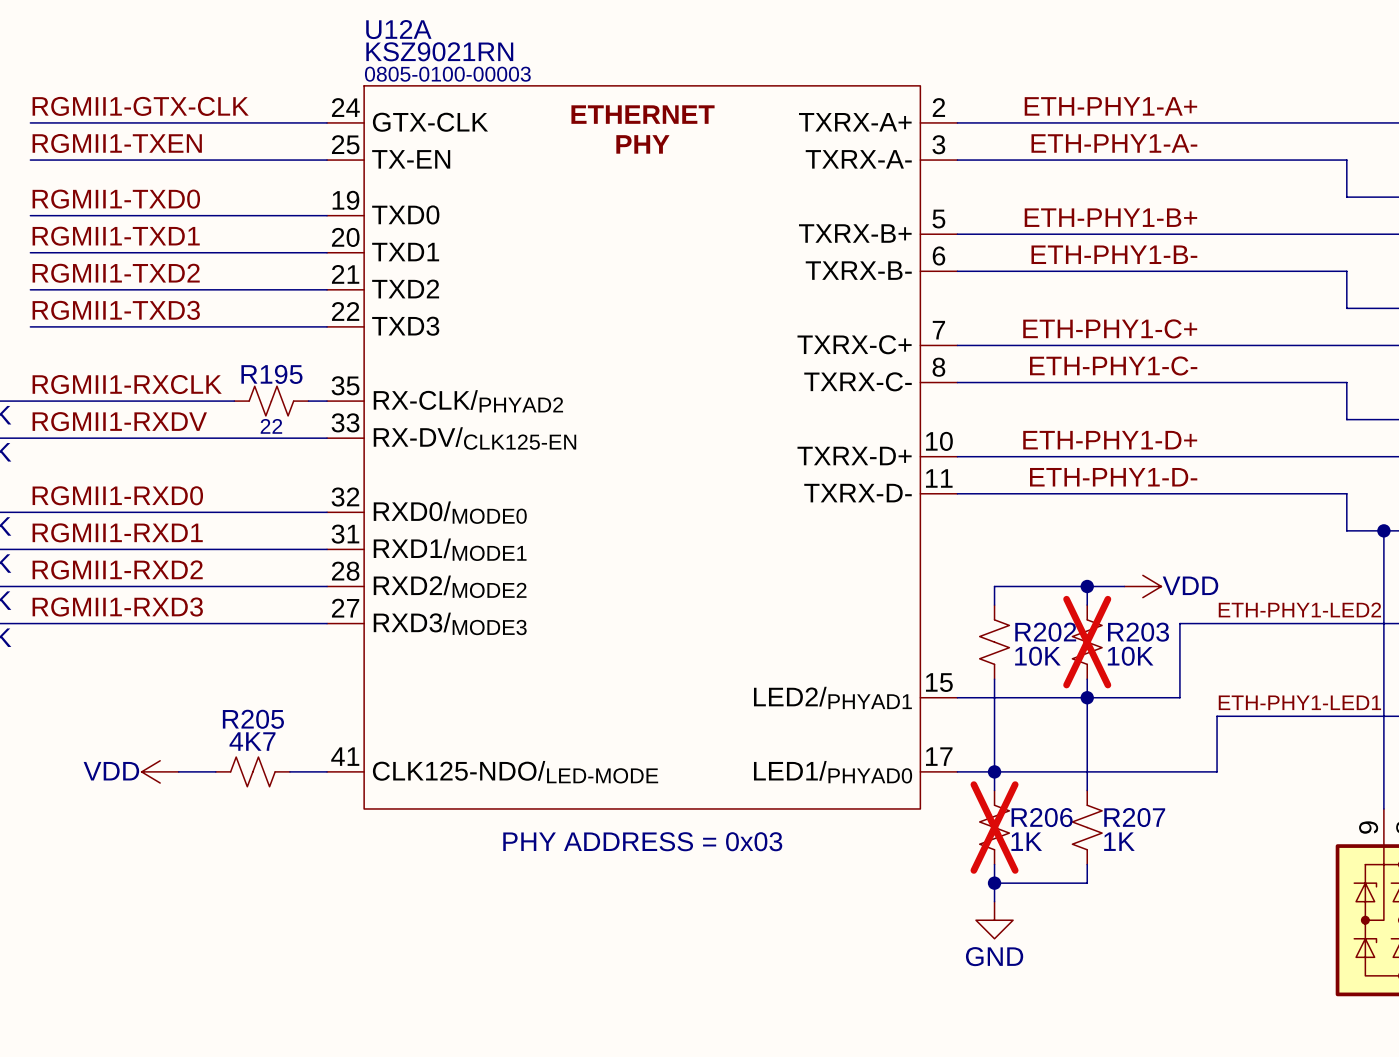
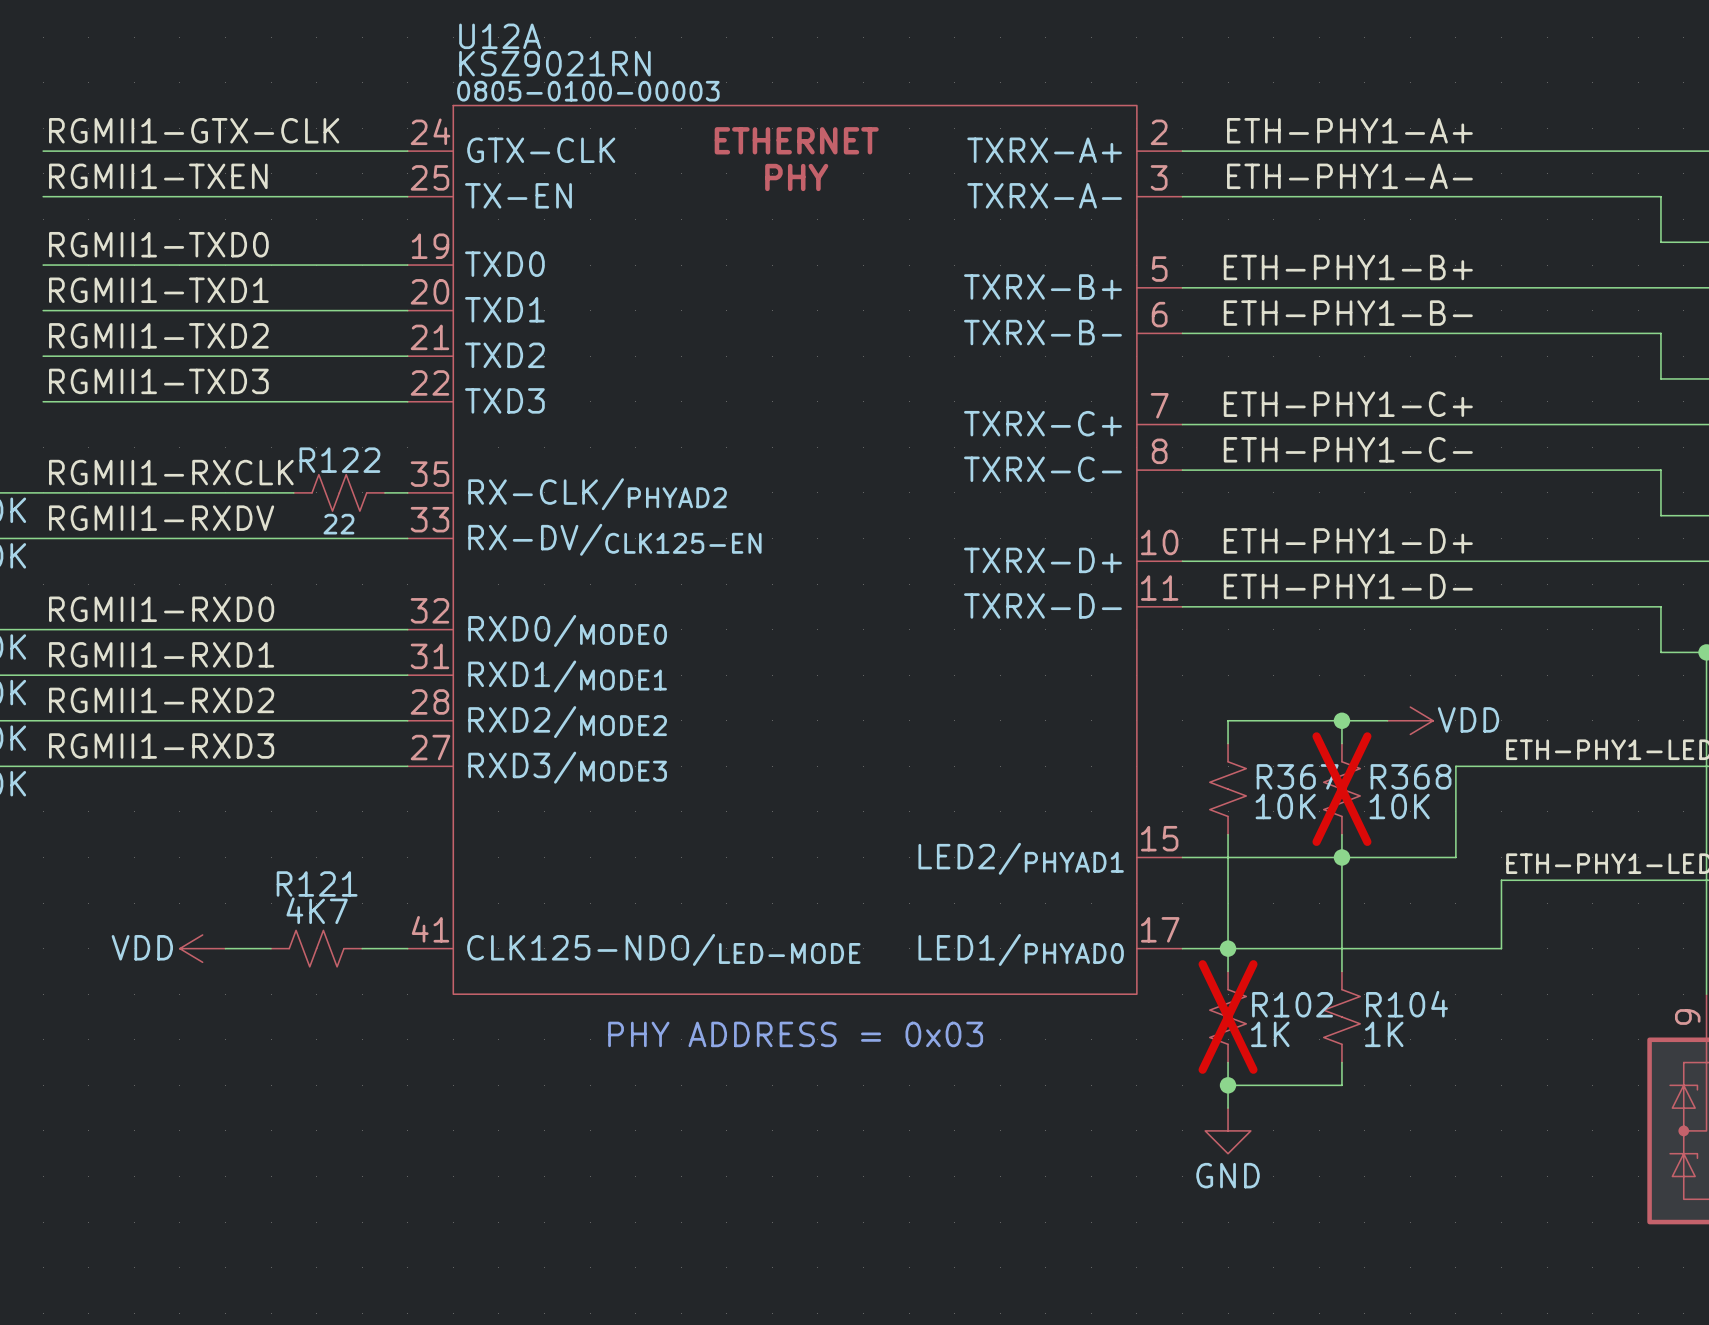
R195 name: R195 (271, 374) -> R122 (339, 460)
R202 name: R202 (1045, 632) -> R367 (1297, 776)
R203 name: R203 (1138, 632) -> R368 (1411, 776)
R205 name: R205 (253, 719) -> R121 (317, 883)
R206 name: R206 (1042, 817) -> R102 (1292, 1004)
R207 name: R207 (1134, 817) -> R104 (1407, 1004)

